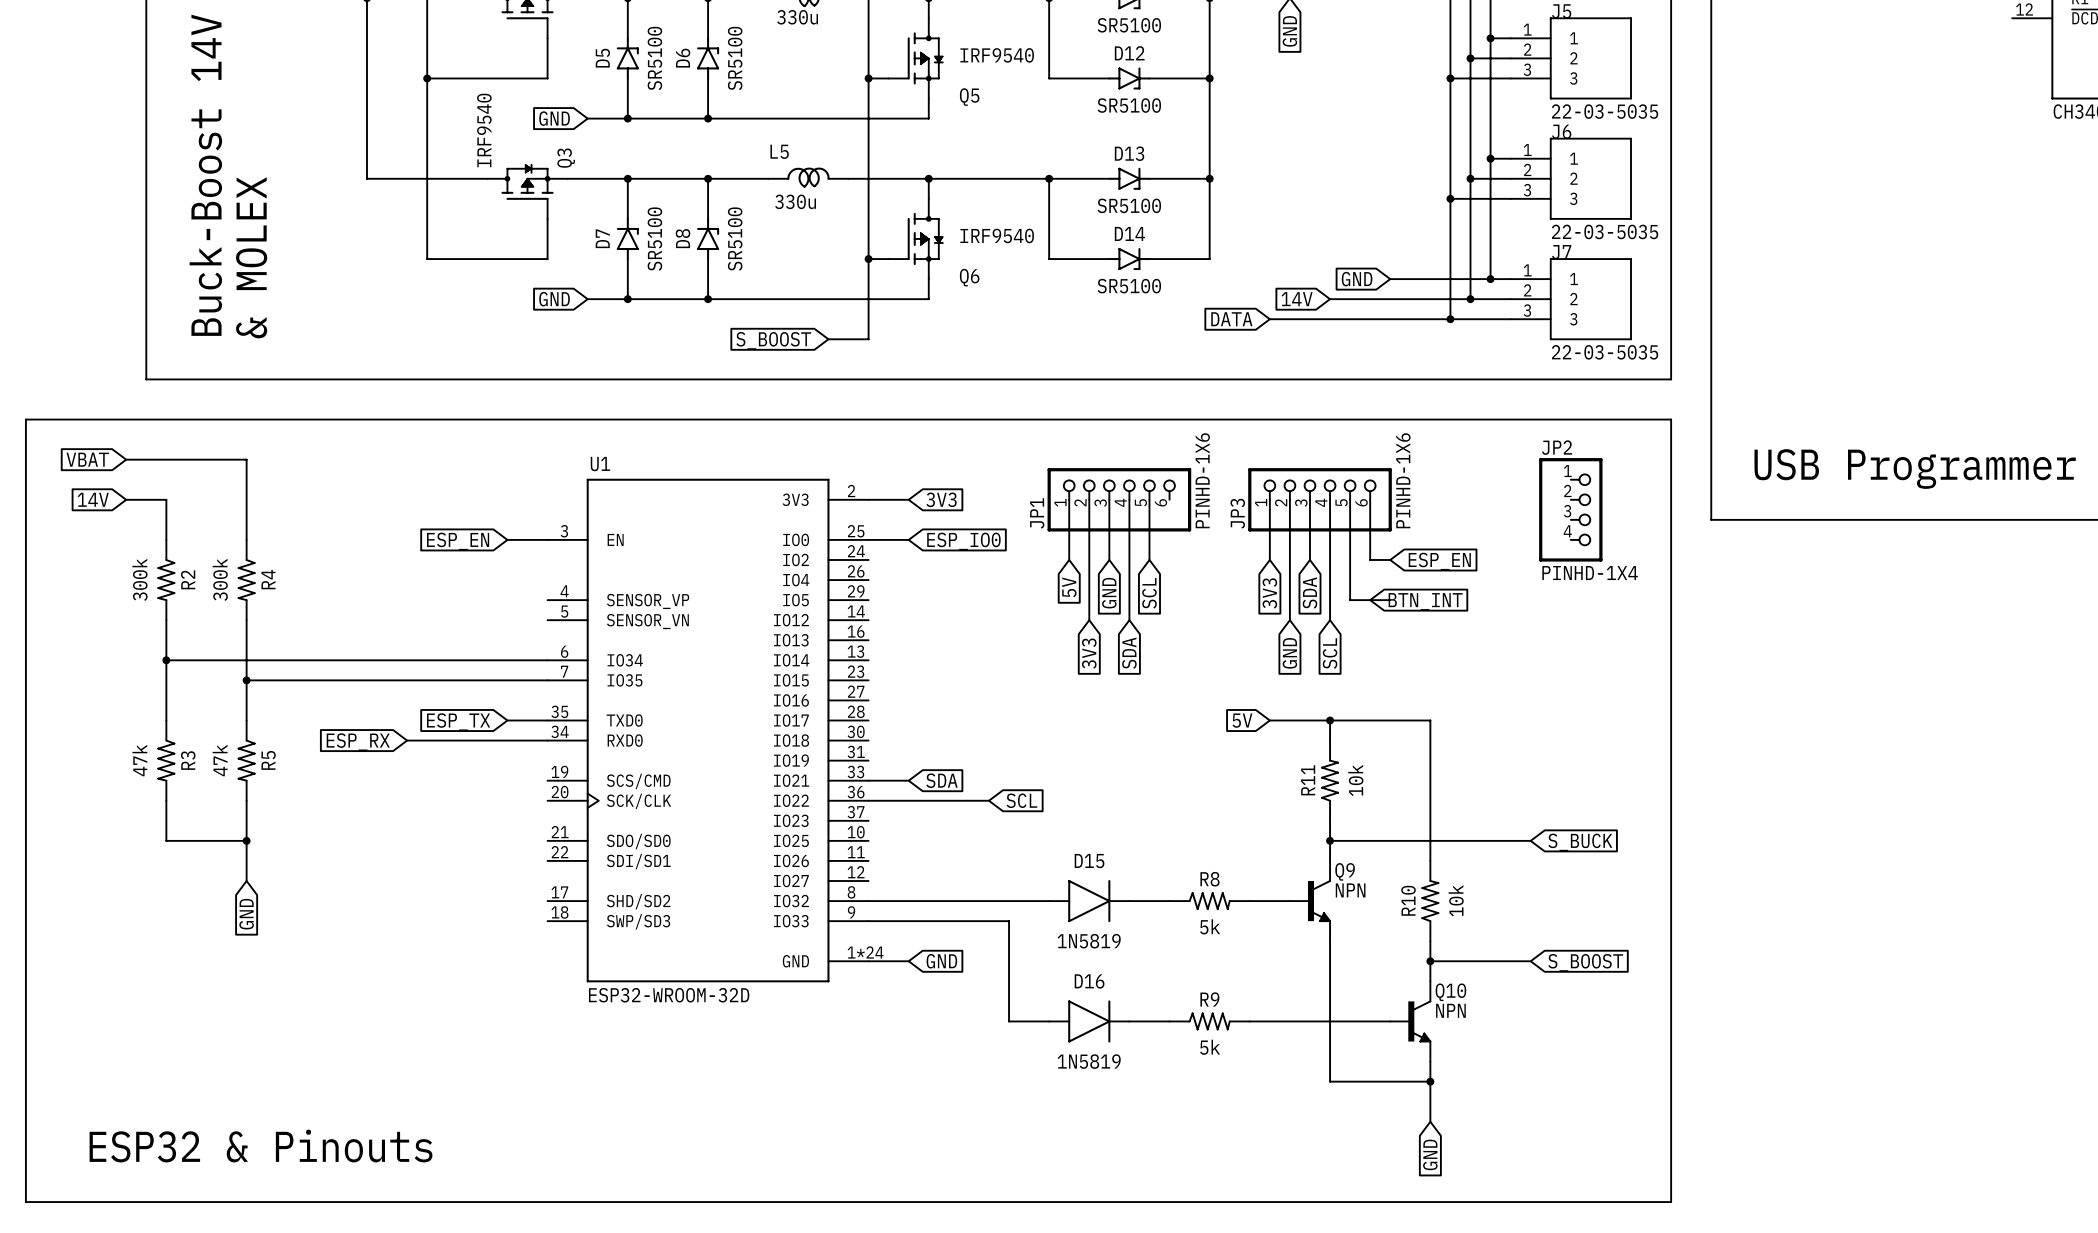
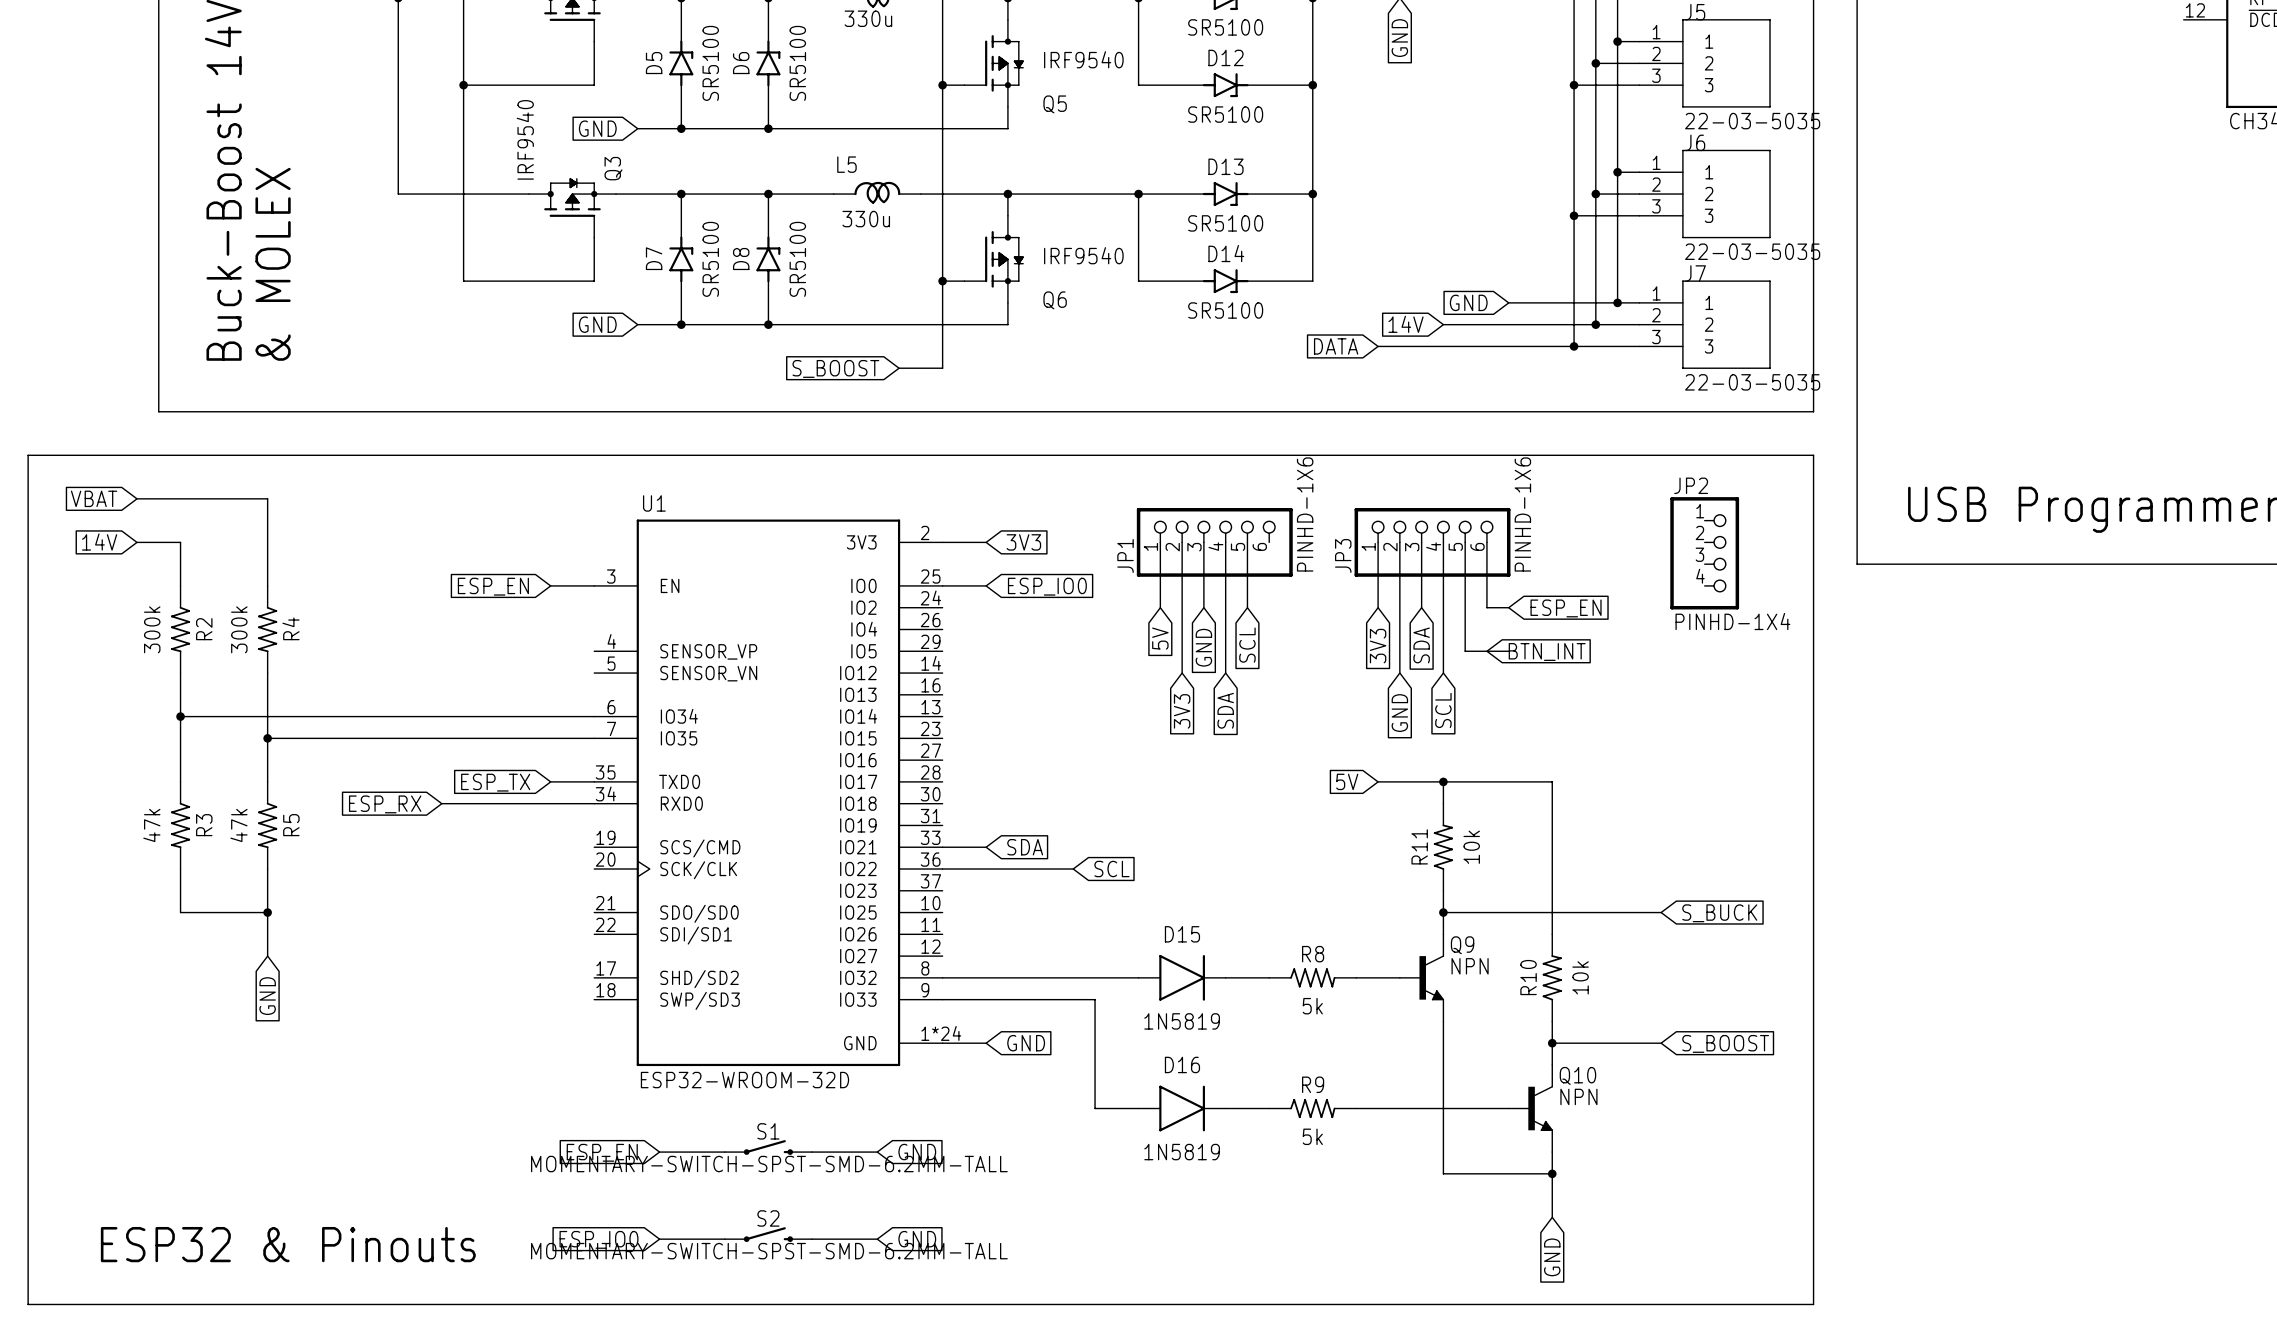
S1: none -> MOMENTARY-SWITCH-SPST-SMD-6.2MM-TALL (768, 1147)
wire: none -> (659, 1152) (724, 1152)
wire: none -> (811, 1152) (877, 1152)
global label: none -> GND (917, 1152)
global label: none -> ESP_EN (602, 1152)
S2: none -> MOMENTARY-SWITCH-SPST-SMD-6.2MM-TALL (768, 1234)
wire: none -> (659, 1239) (724, 1239)
wire: none -> (811, 1239) (877, 1239)
global label: none -> GND (917, 1239)
global label: none -> ESP_IO0 (598, 1239)

